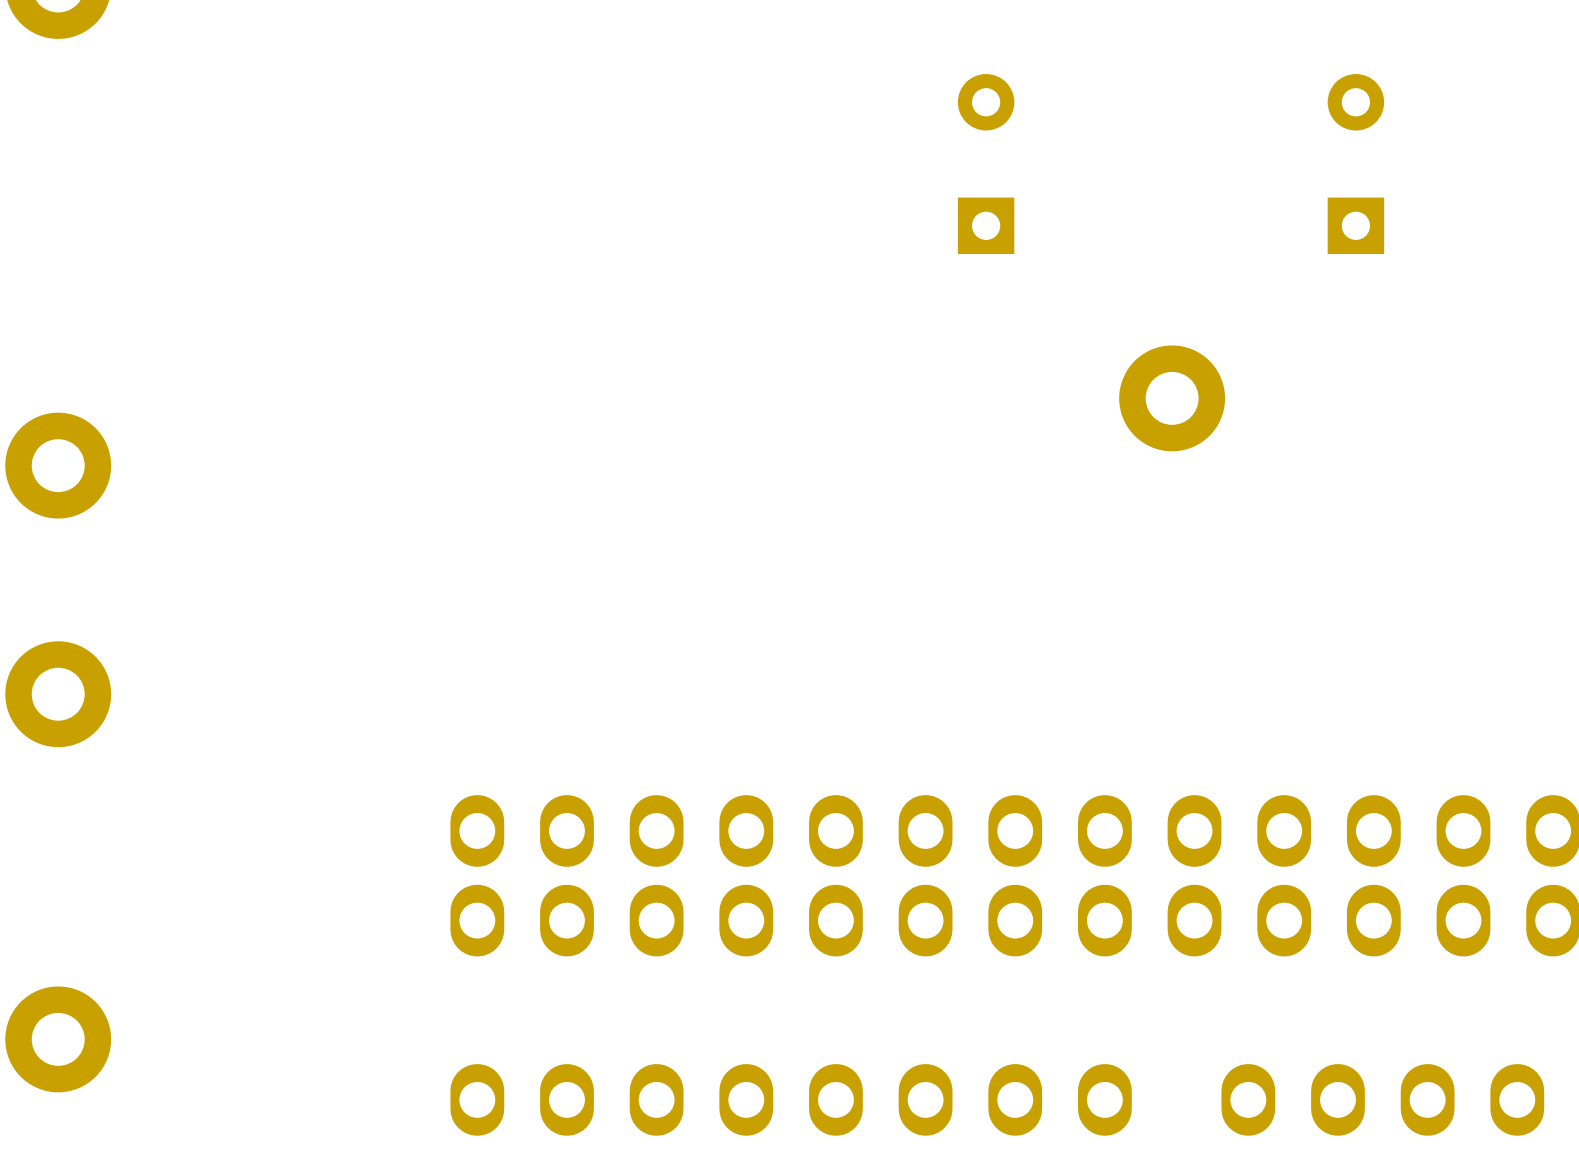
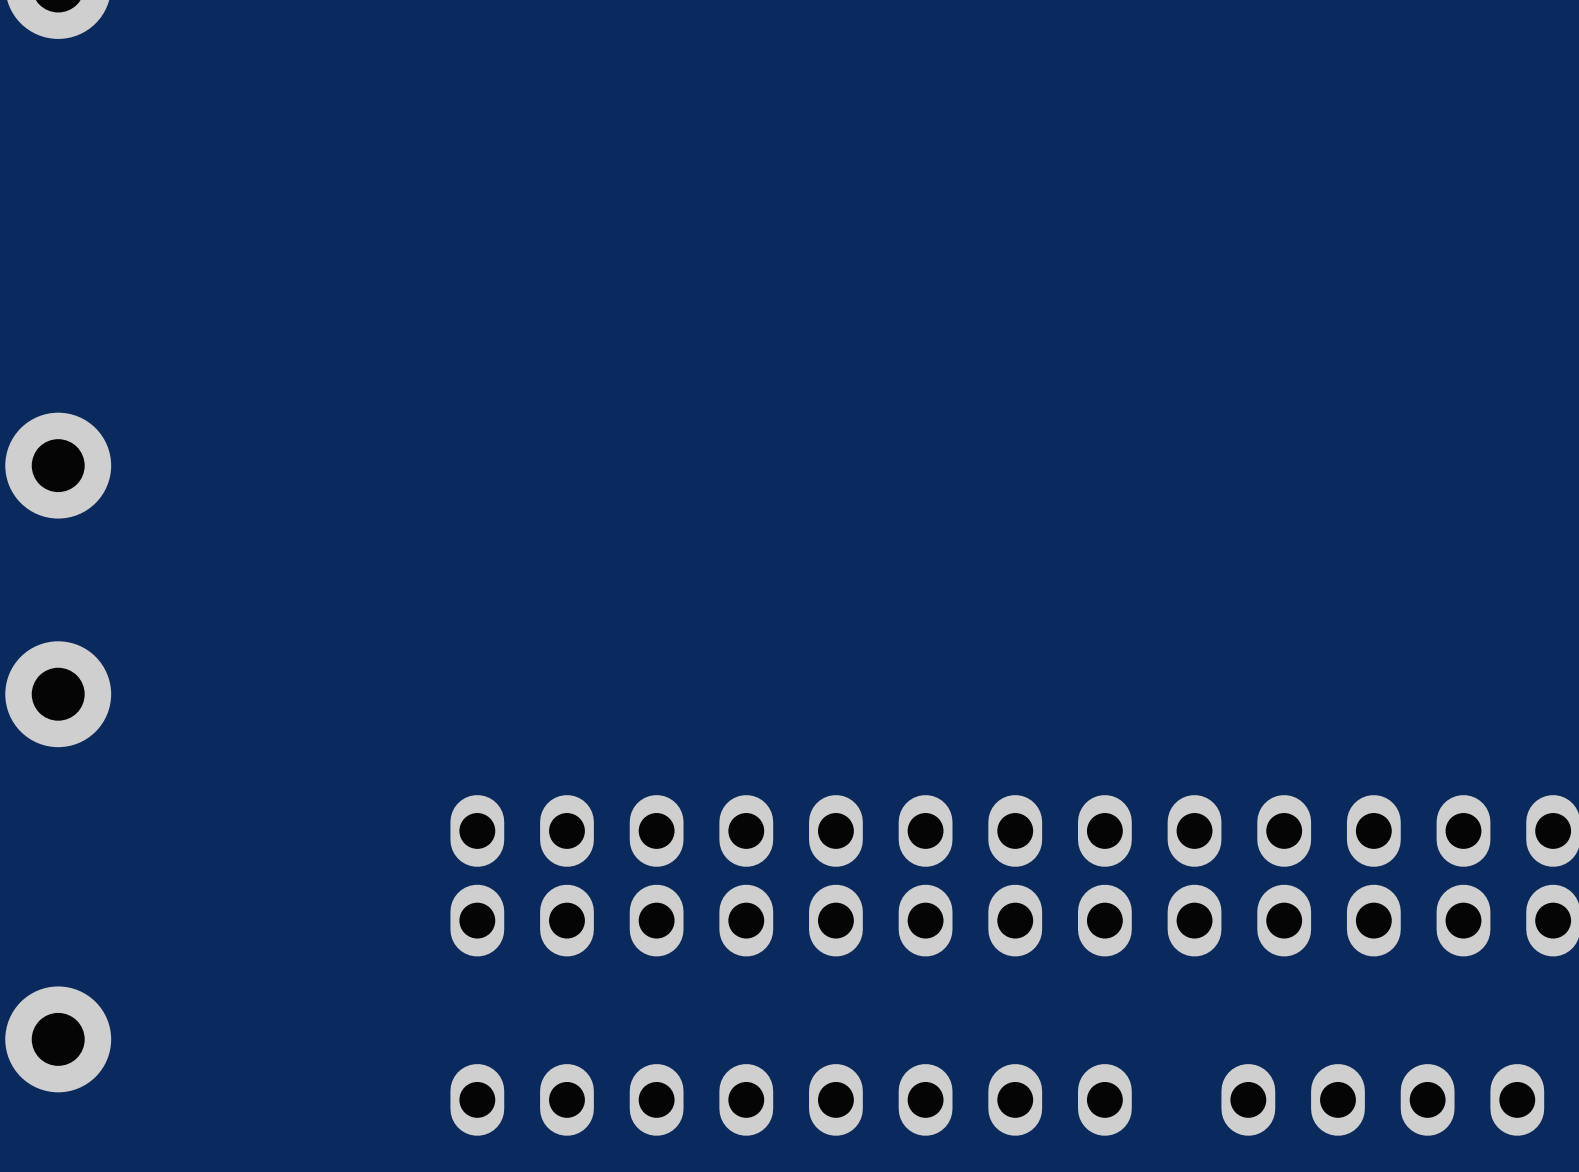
part: (986, 164) -> none
part: (1355, 164) -> none
part: (1172, 398) -> none

